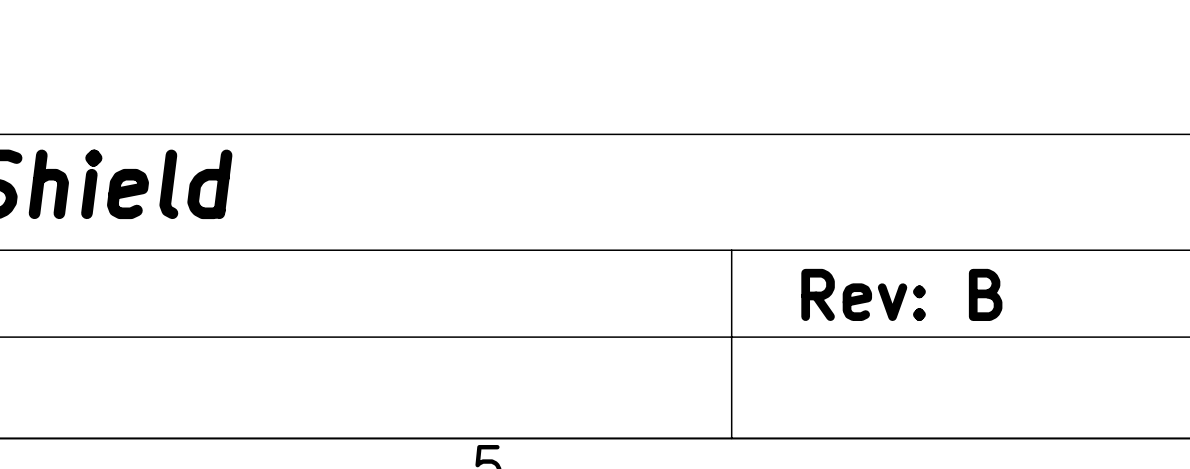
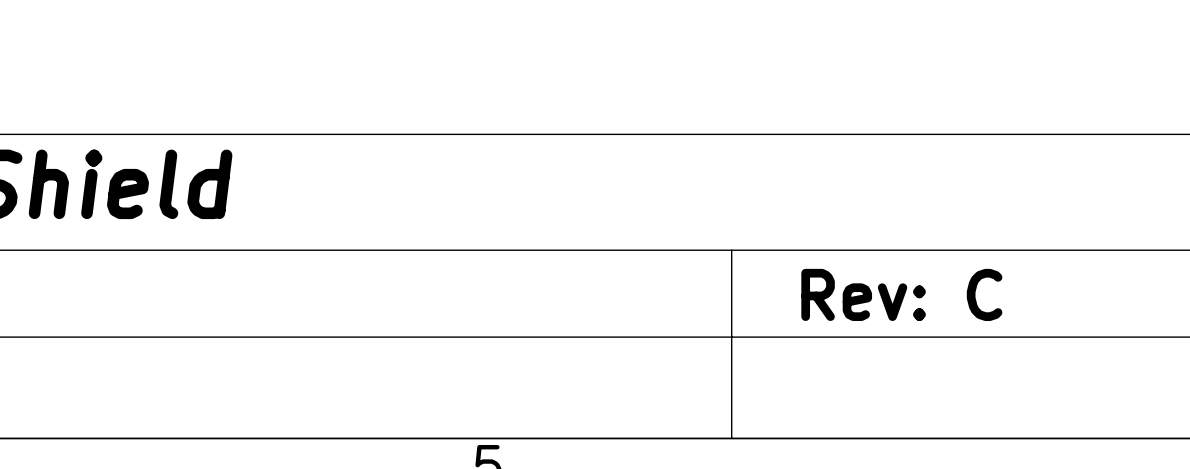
title block: Rev: B (901, 294) -> Rev: C (901, 294)

